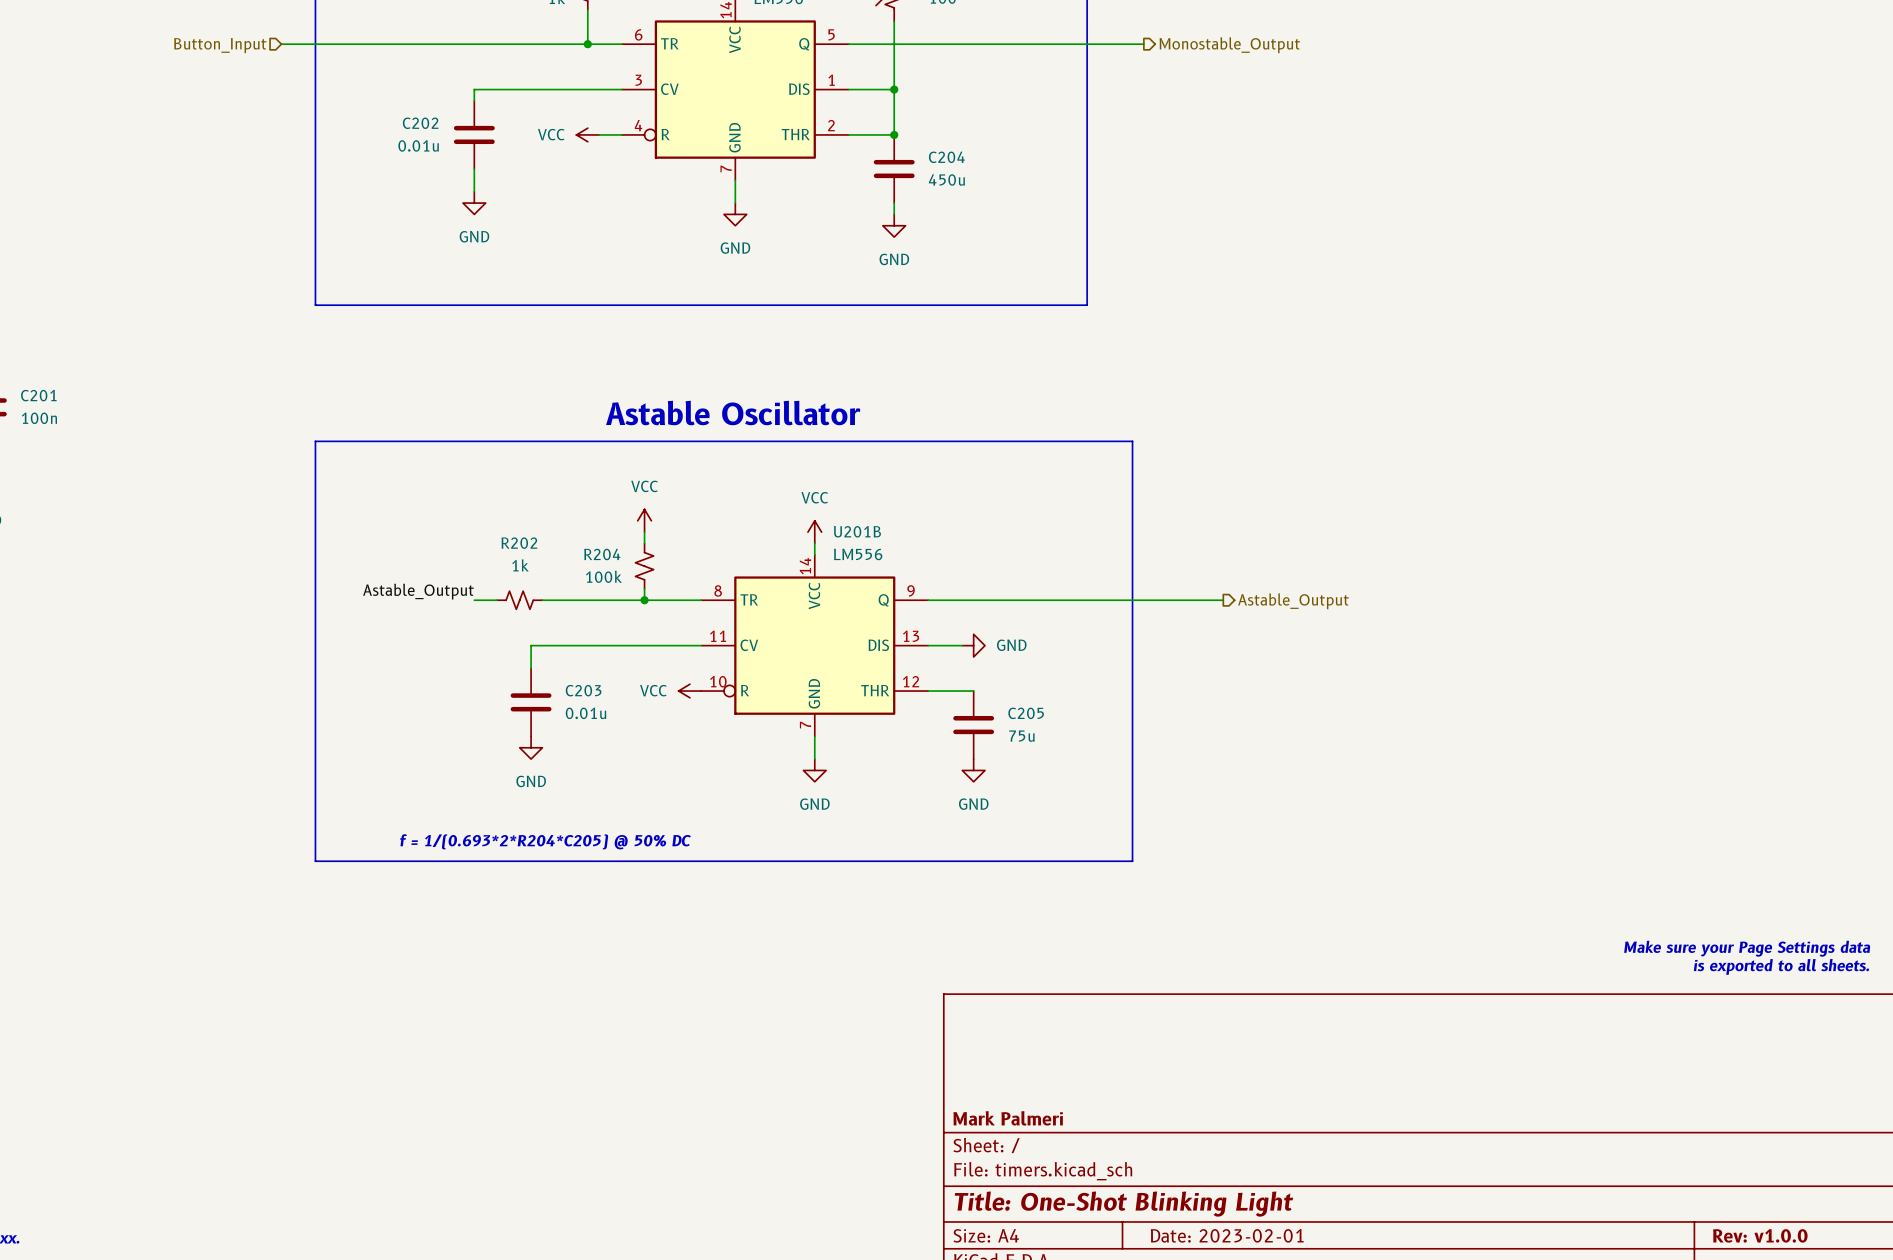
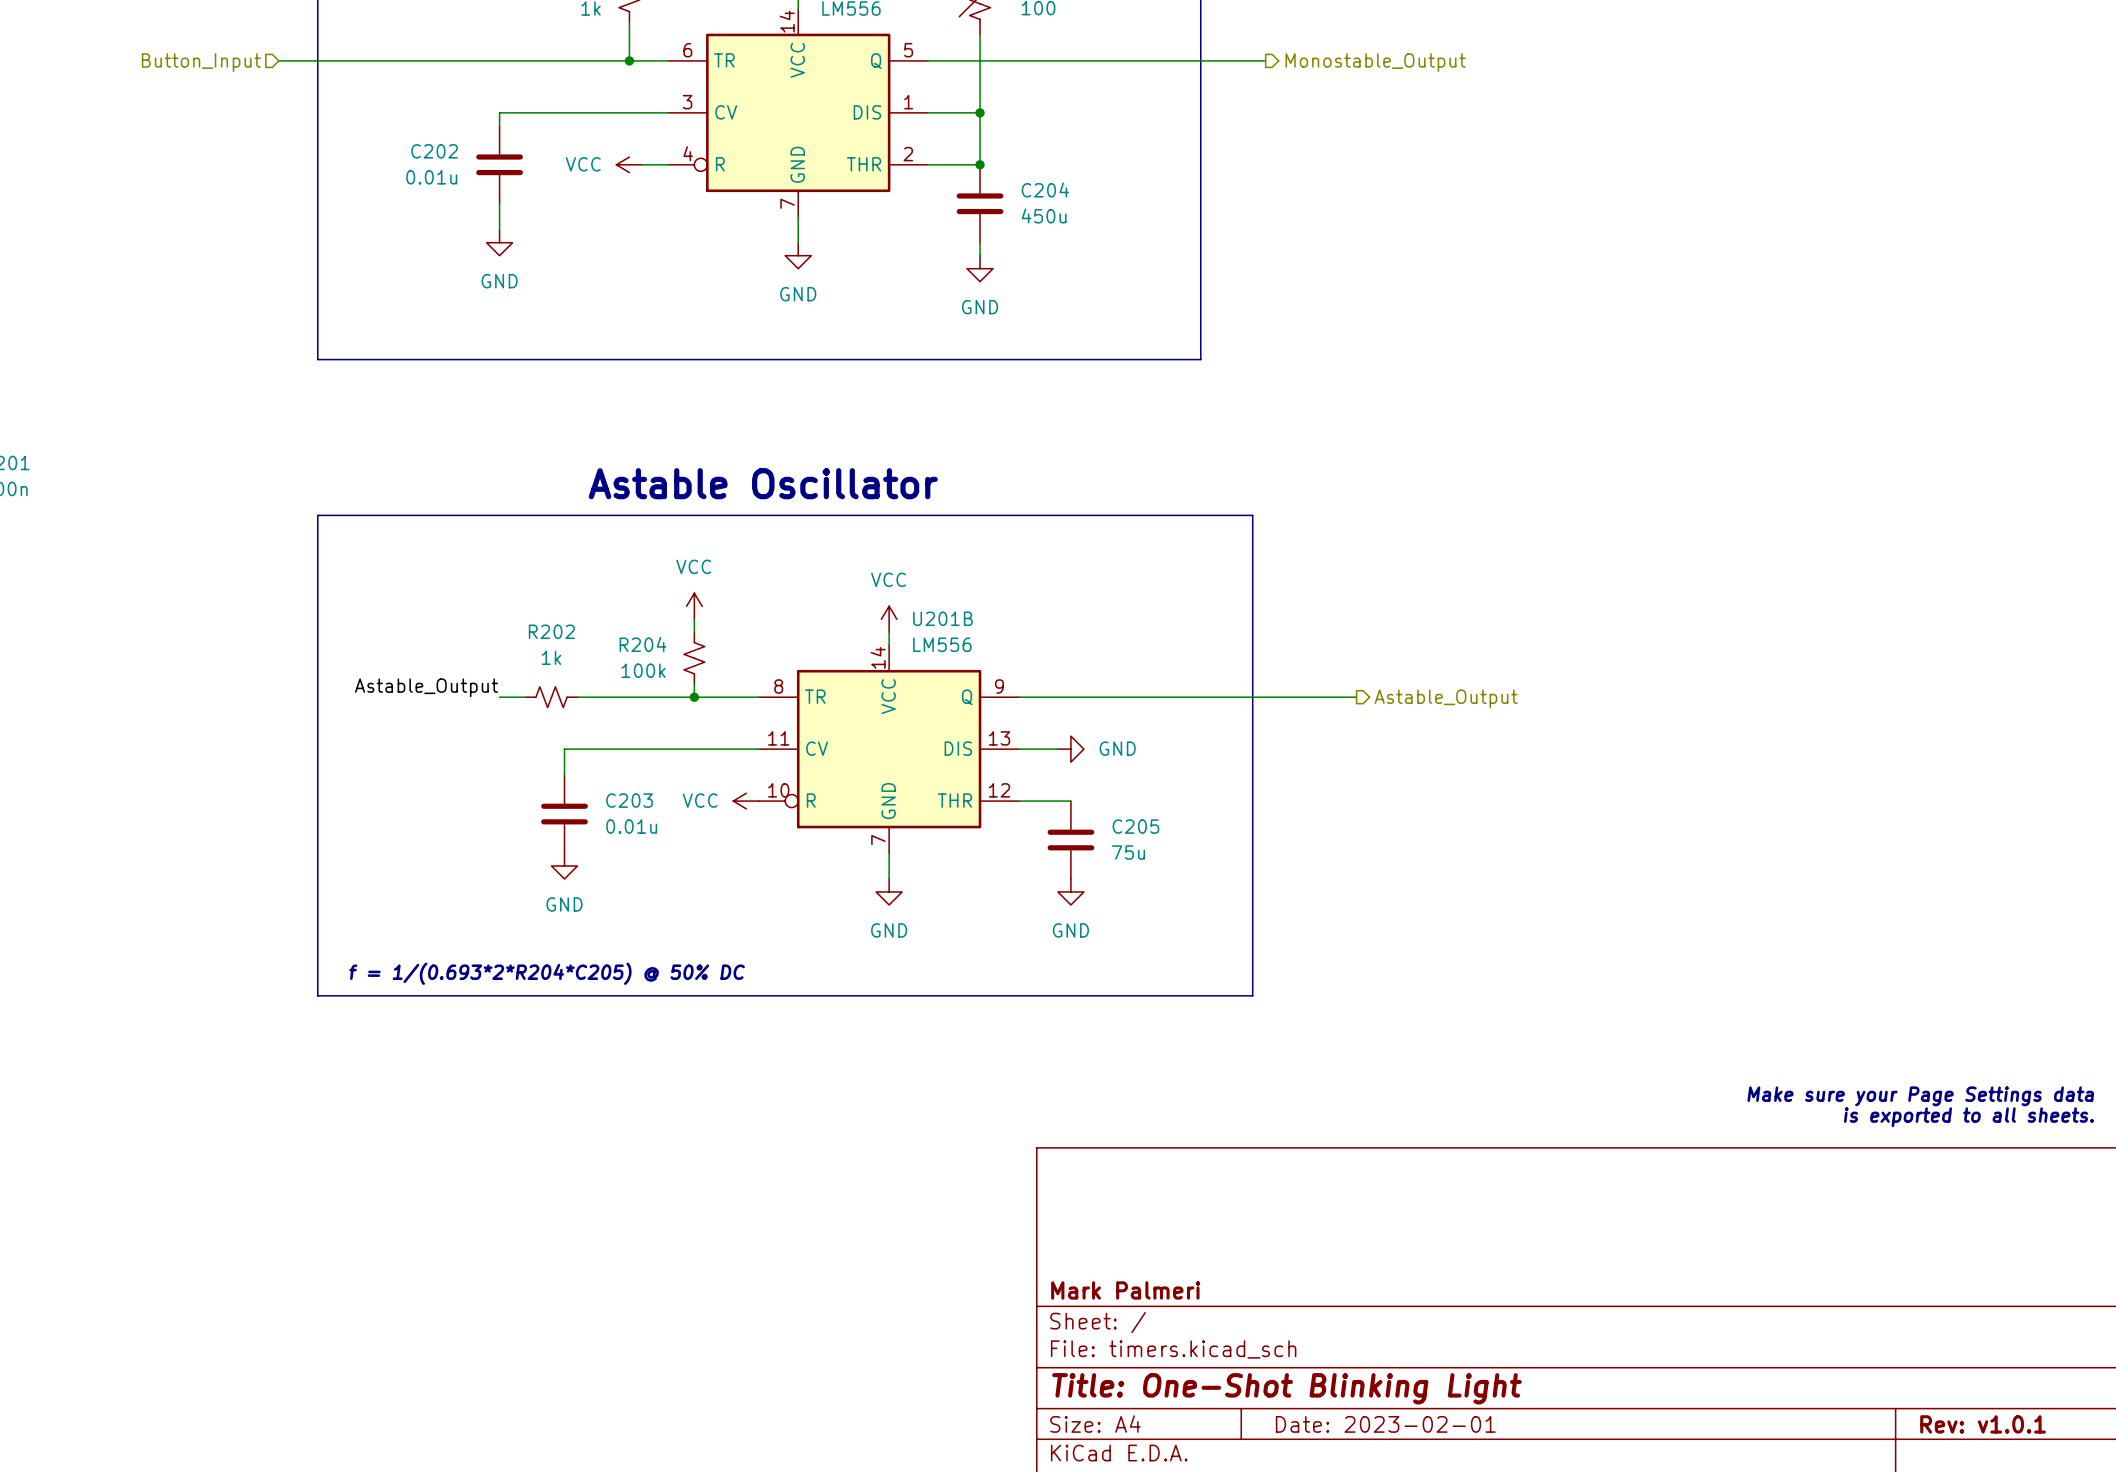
title block: Rev: v1.0.0 (1760, 1235) -> Rev: v1.0.1 (1983, 1424)

